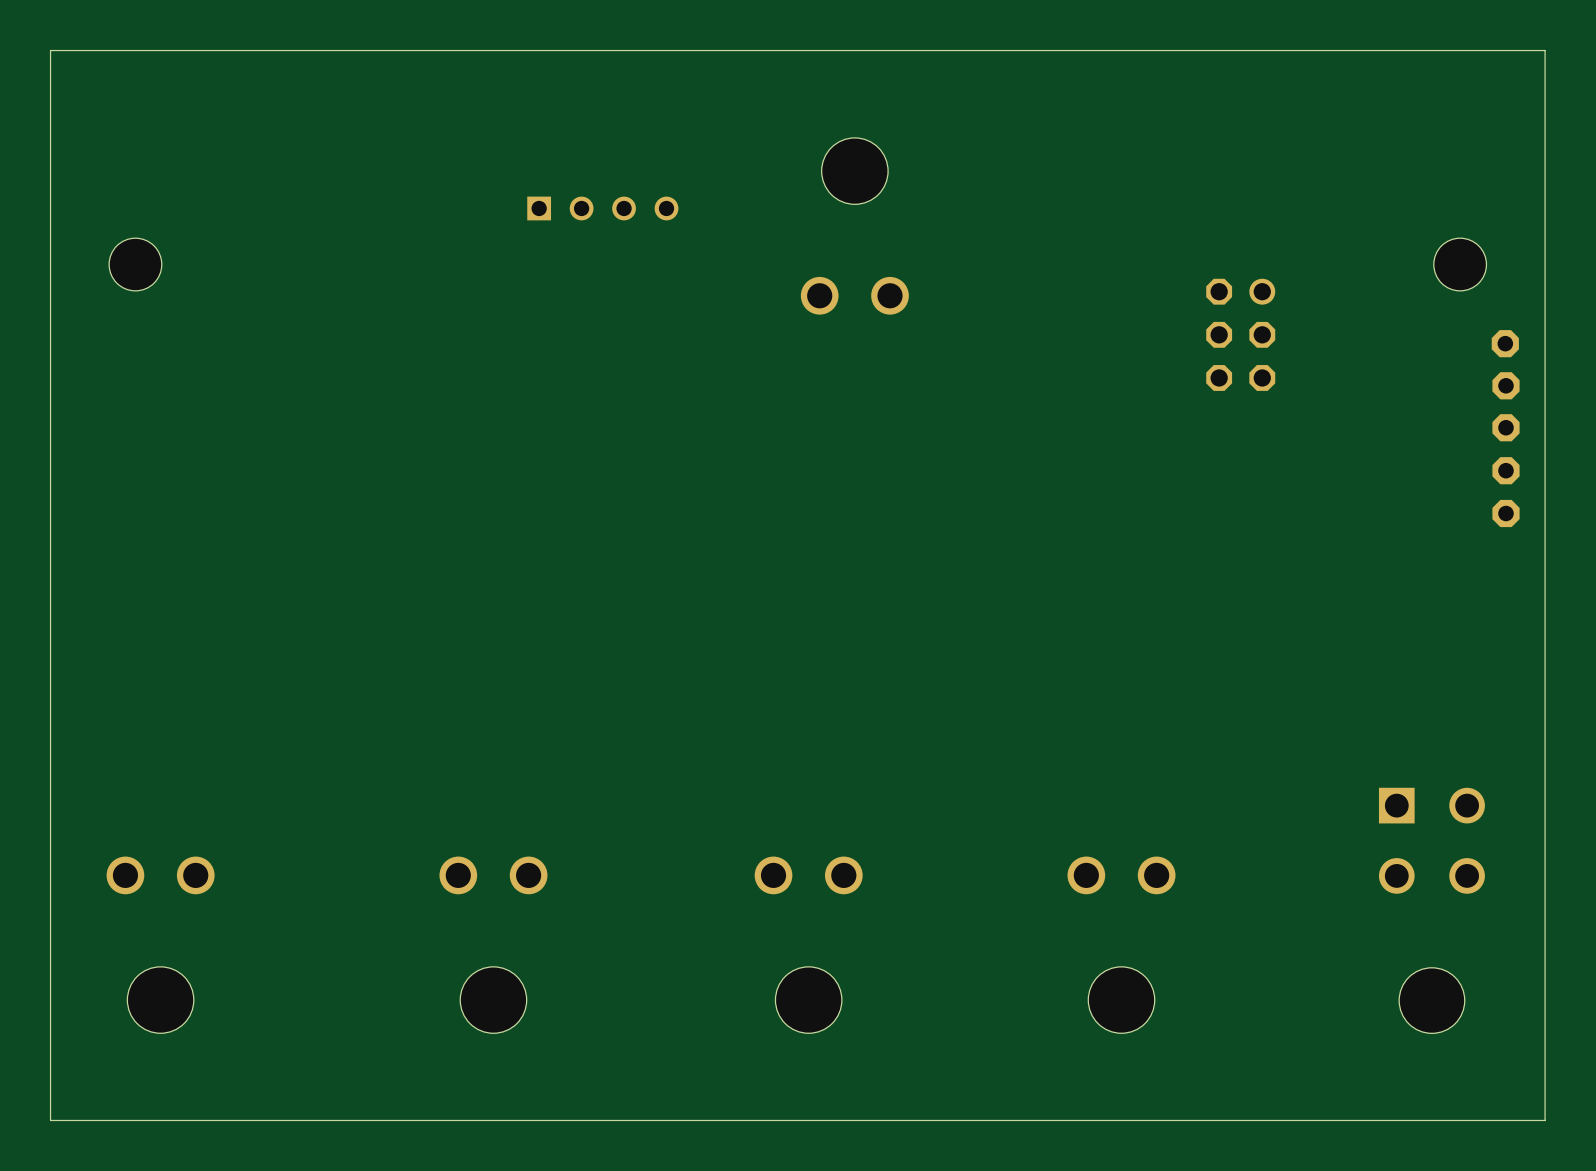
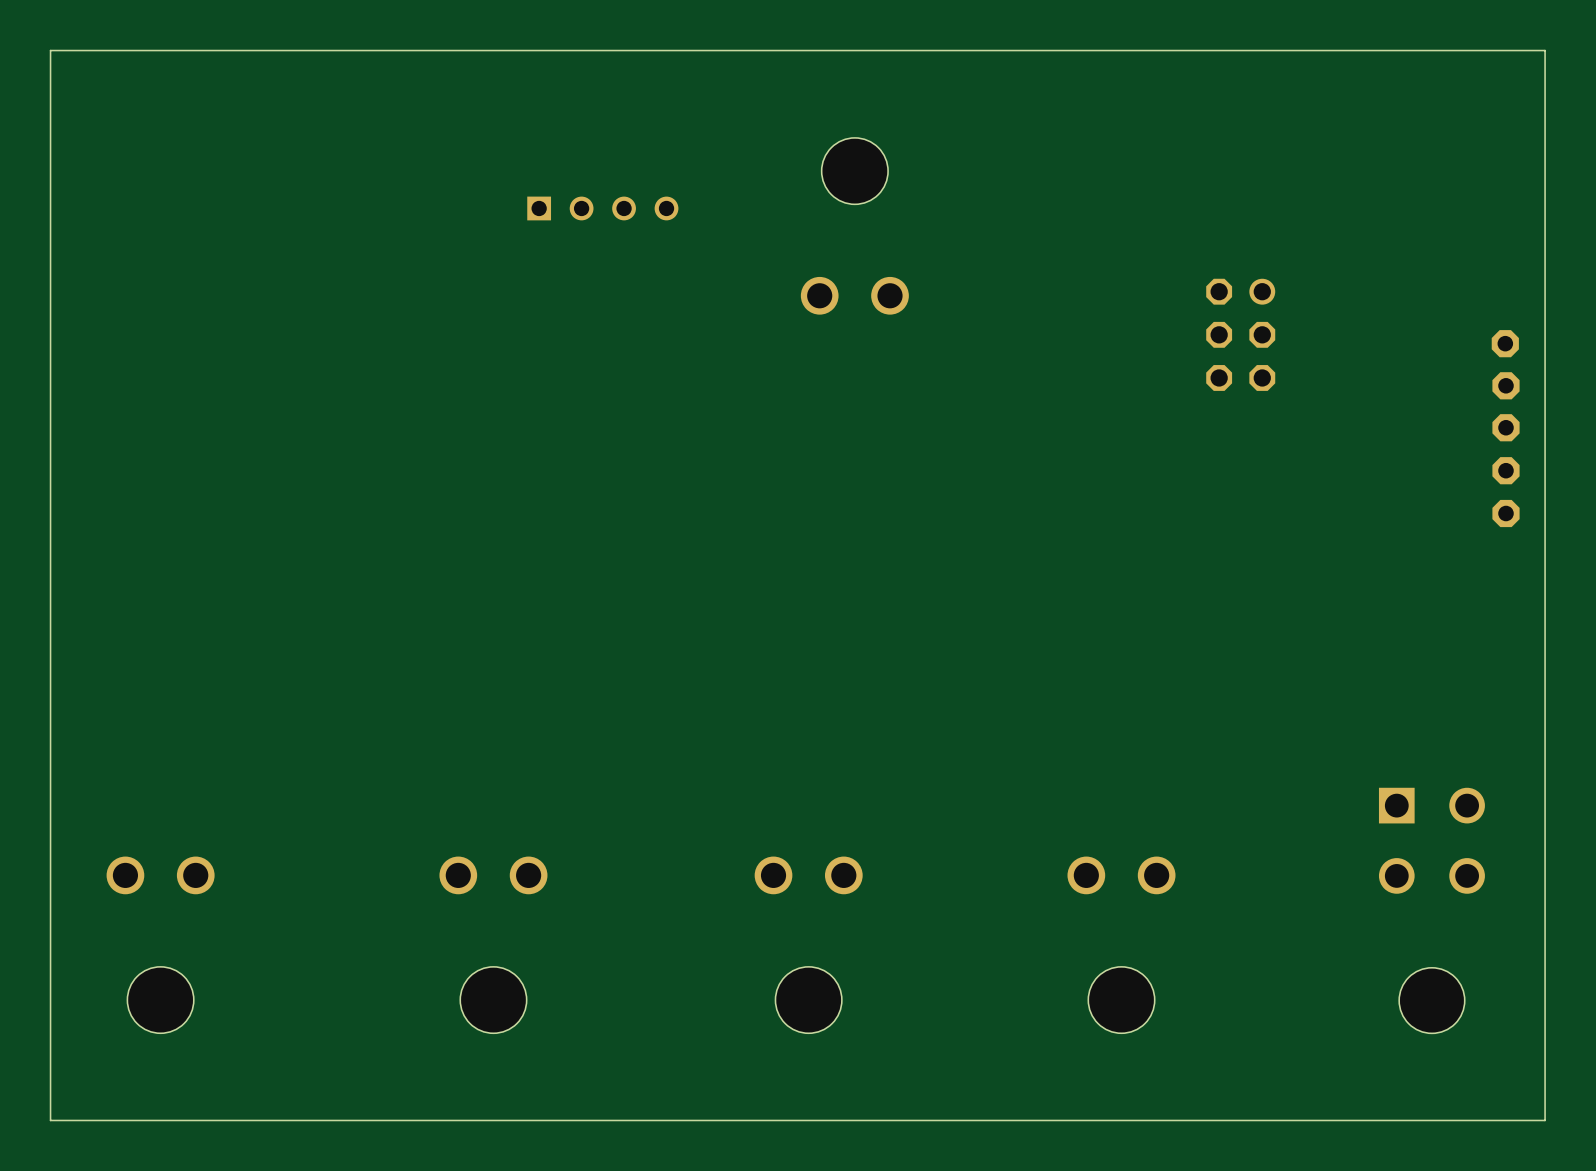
hole: (135, 264) -> none
hole: (1460, 264) -> none

